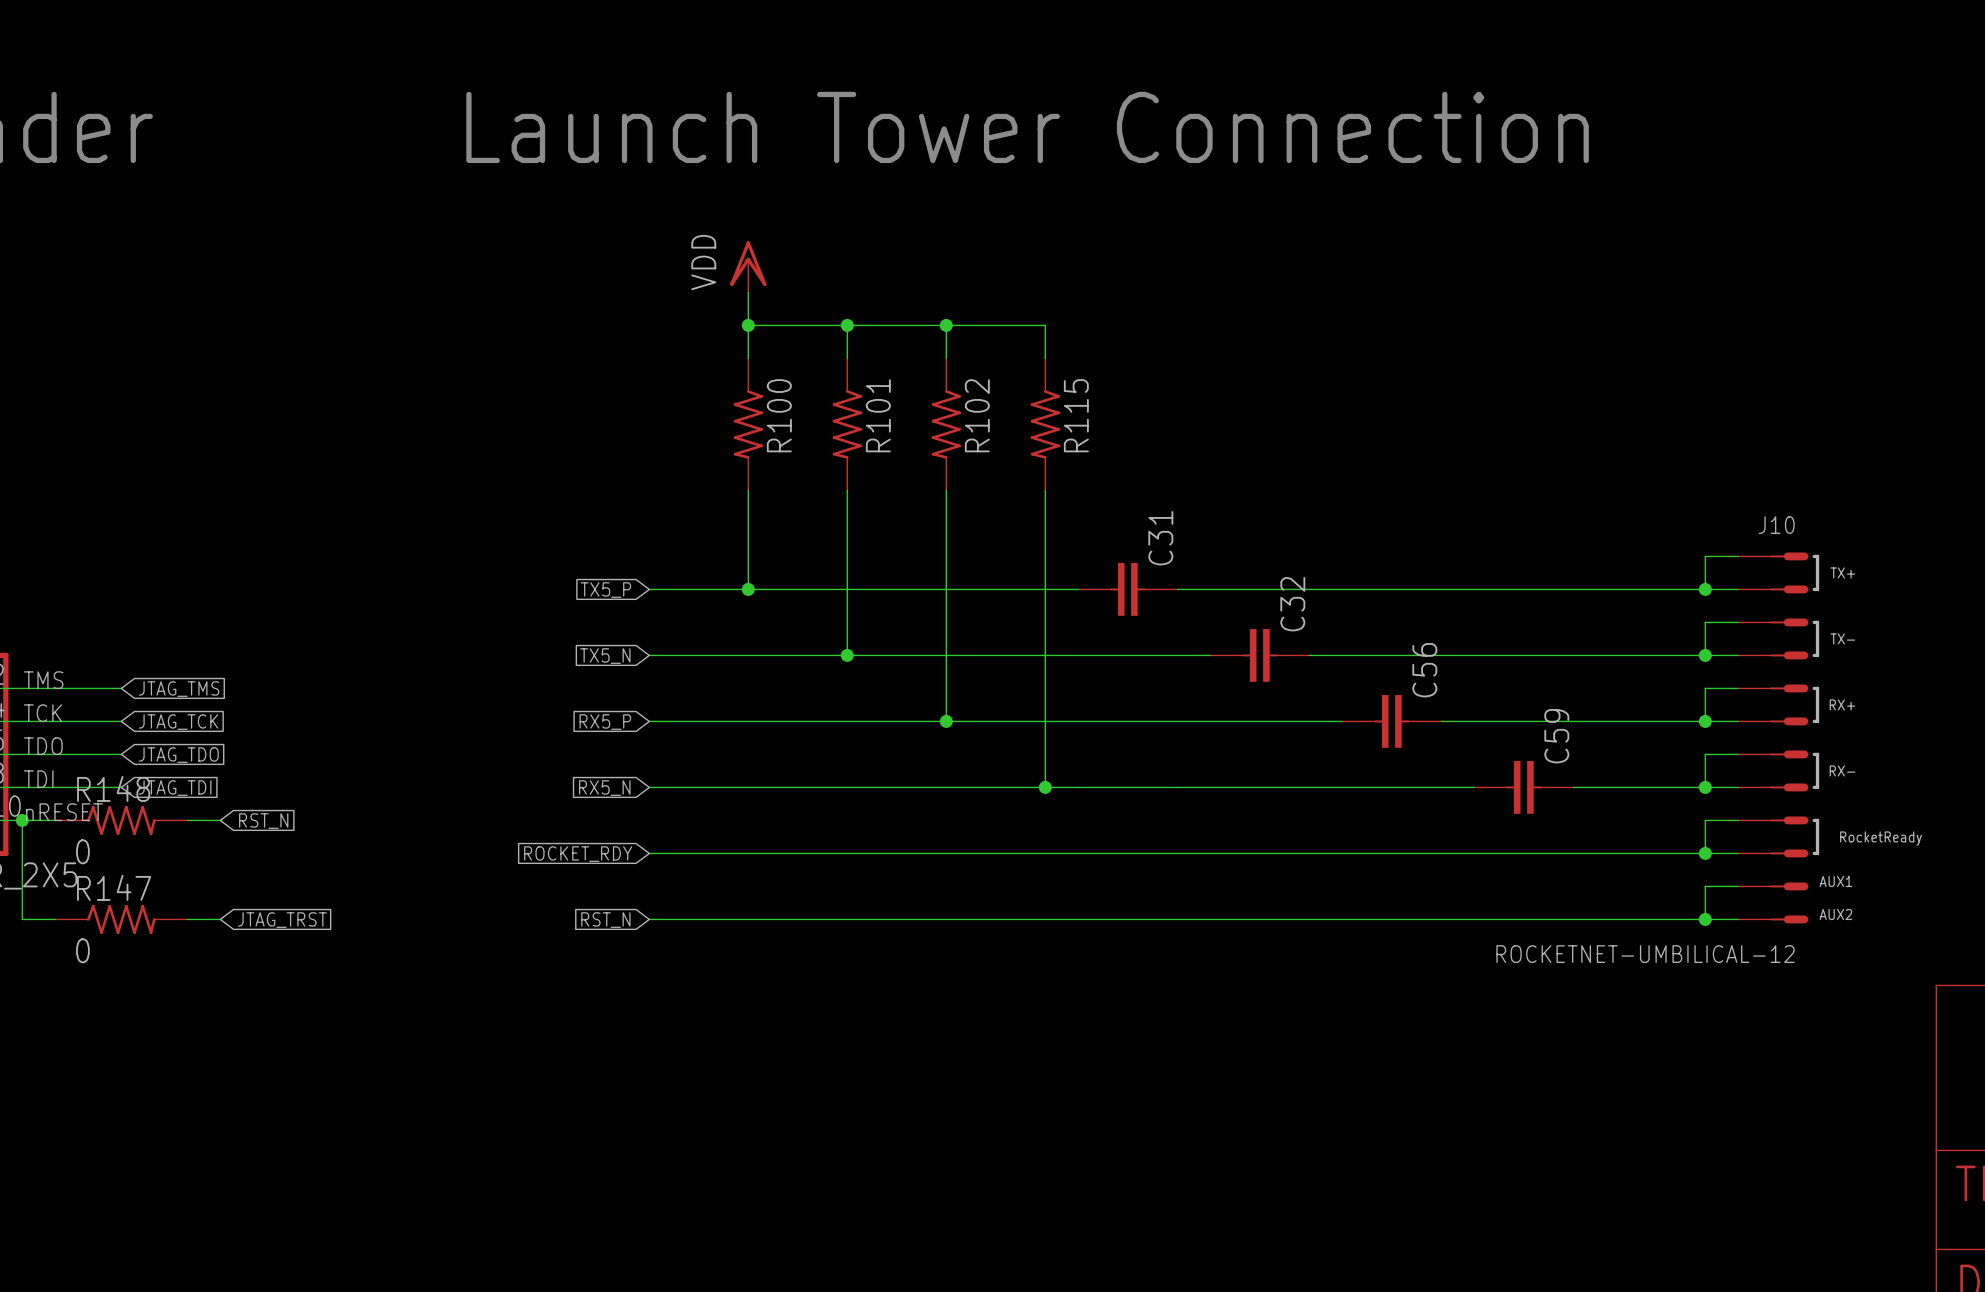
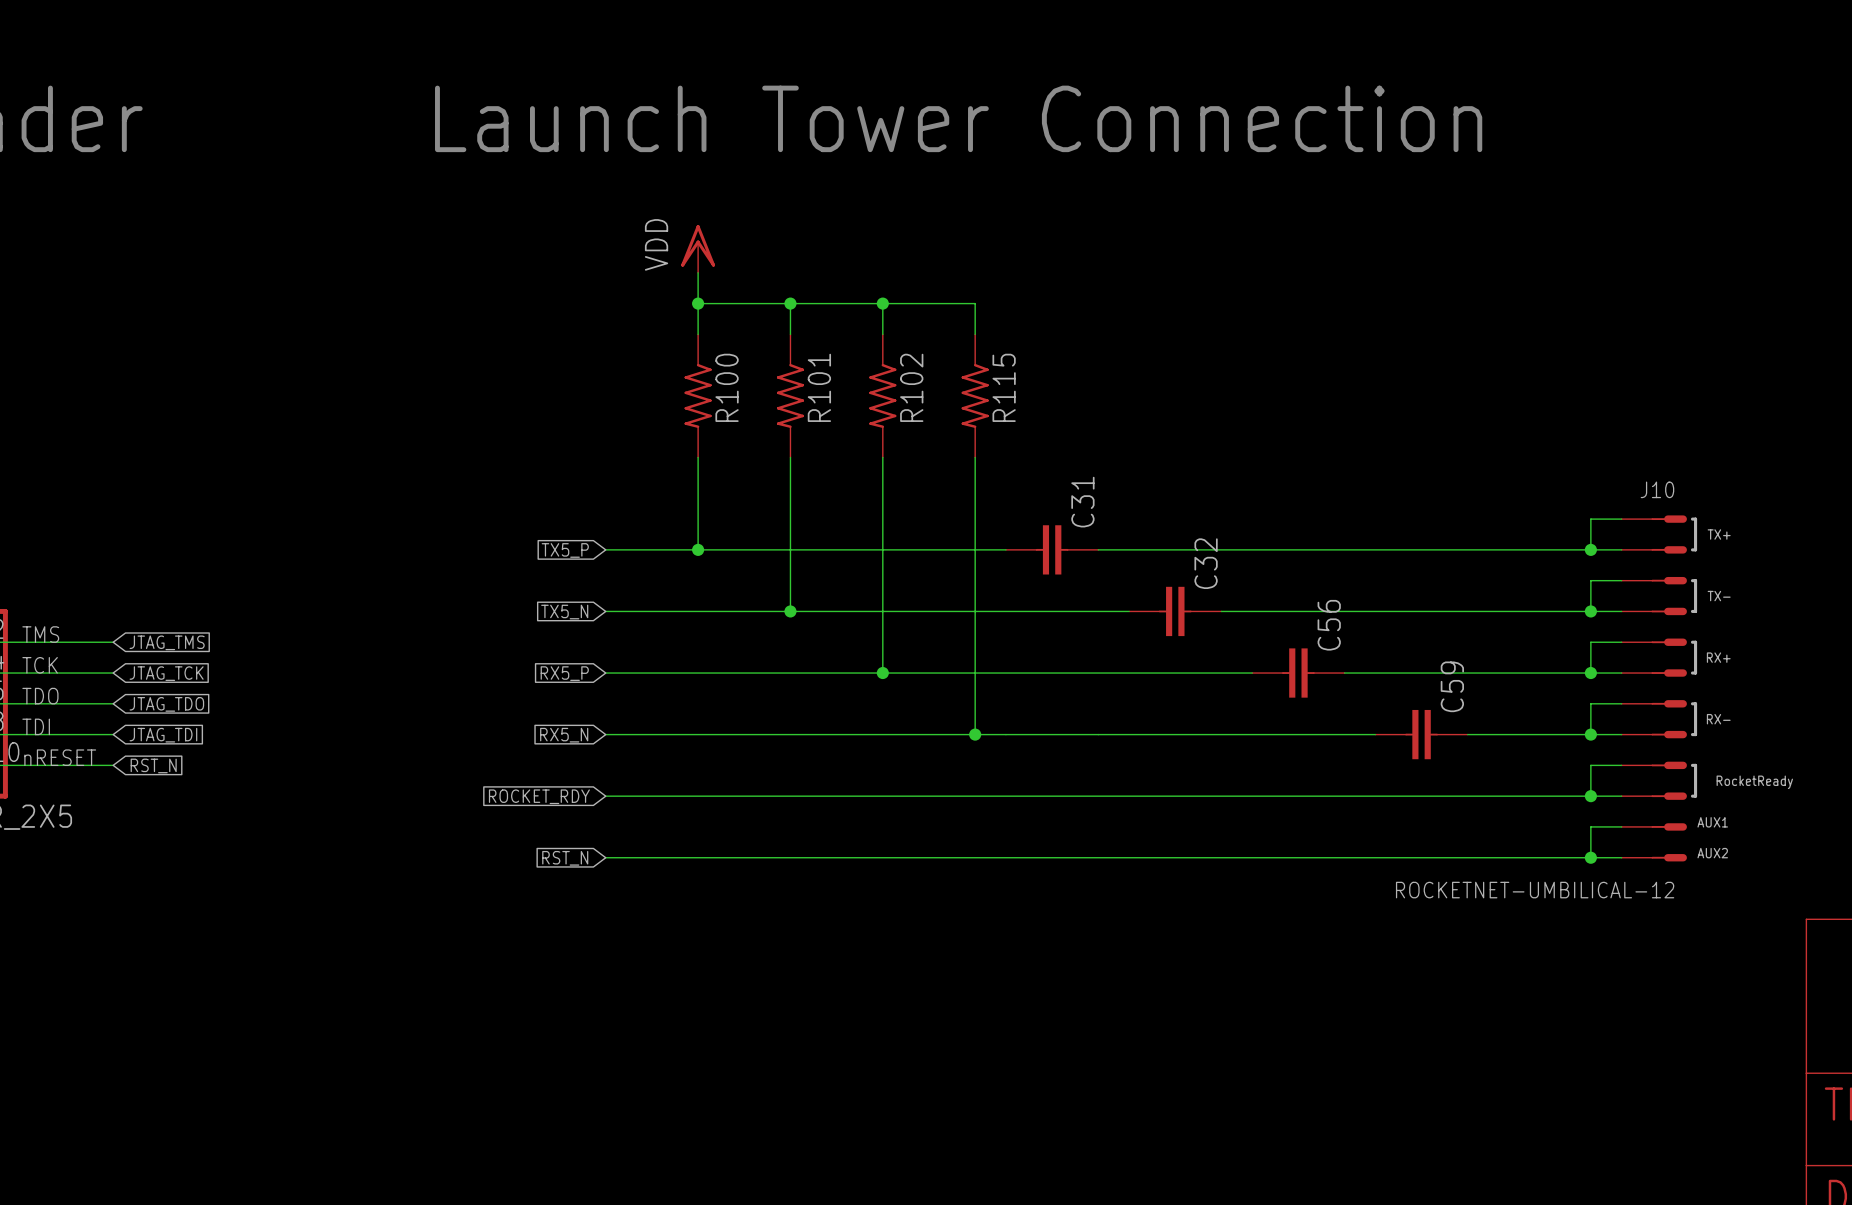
wire: (22, 820) (22, 919) (55, 919) -> none
junction: (22, 820) -> none
R148: 0 (121, 820) -> none
wire: (187, 820) (220, 820) -> none
global label position: RST_N (263, 821) -> RST_N (153, 765)
R147: 0 (121, 919) -> none
wire: (187, 919) (220, 919) -> none
global label: JTAG_TRST (282, 920) -> none

